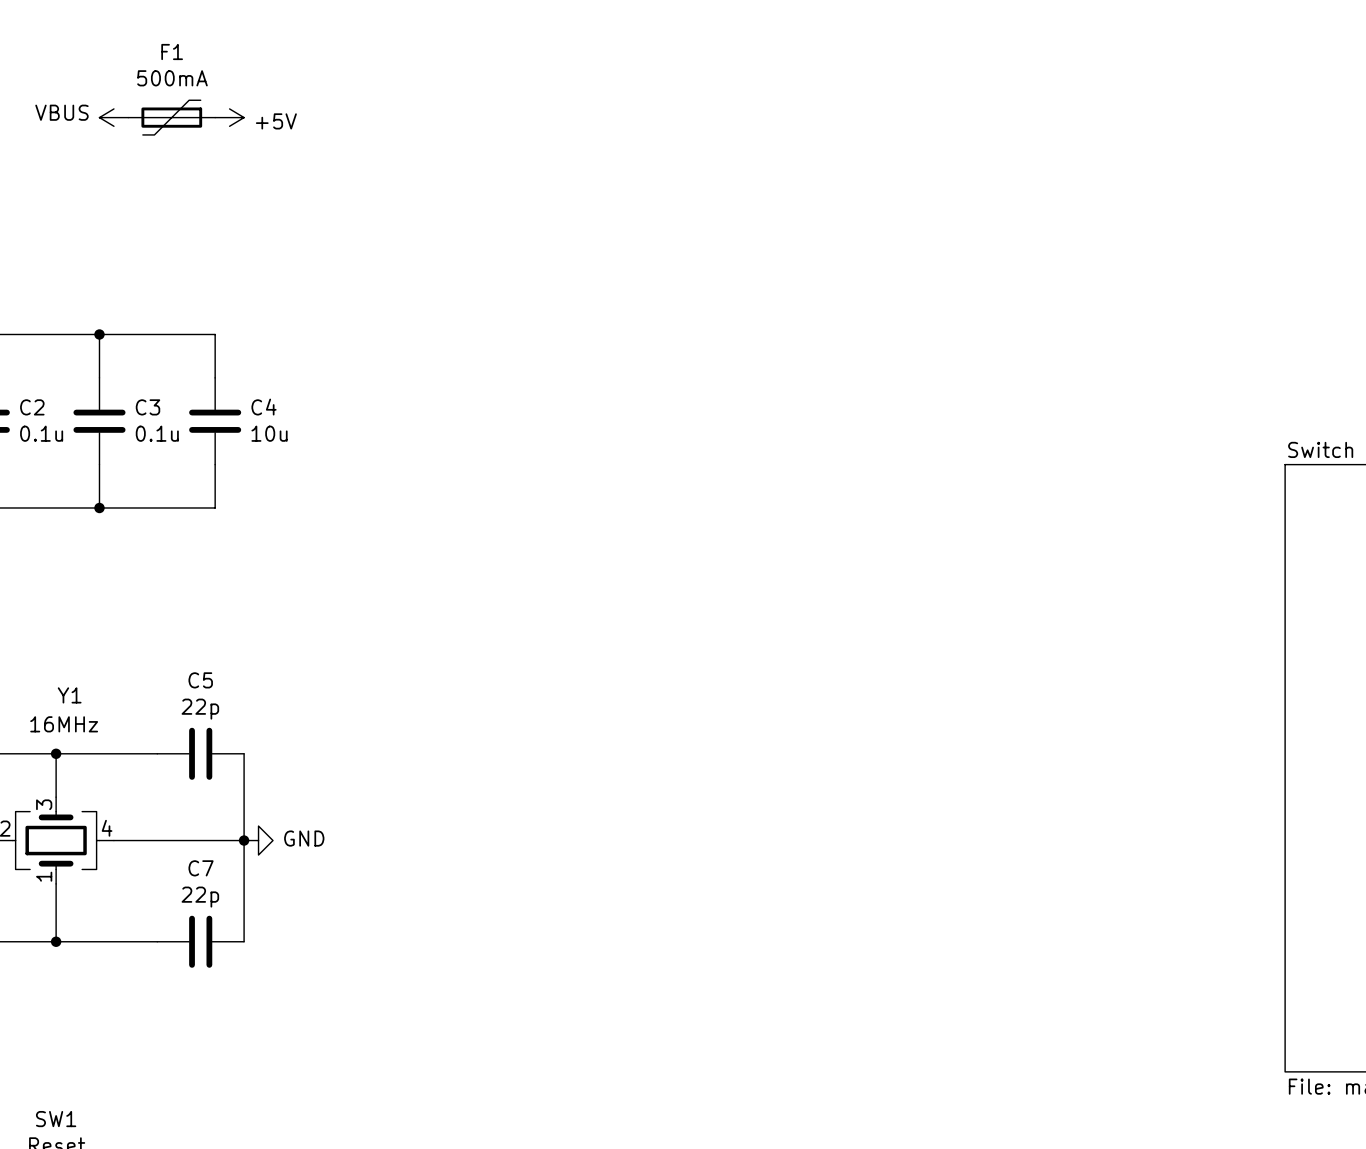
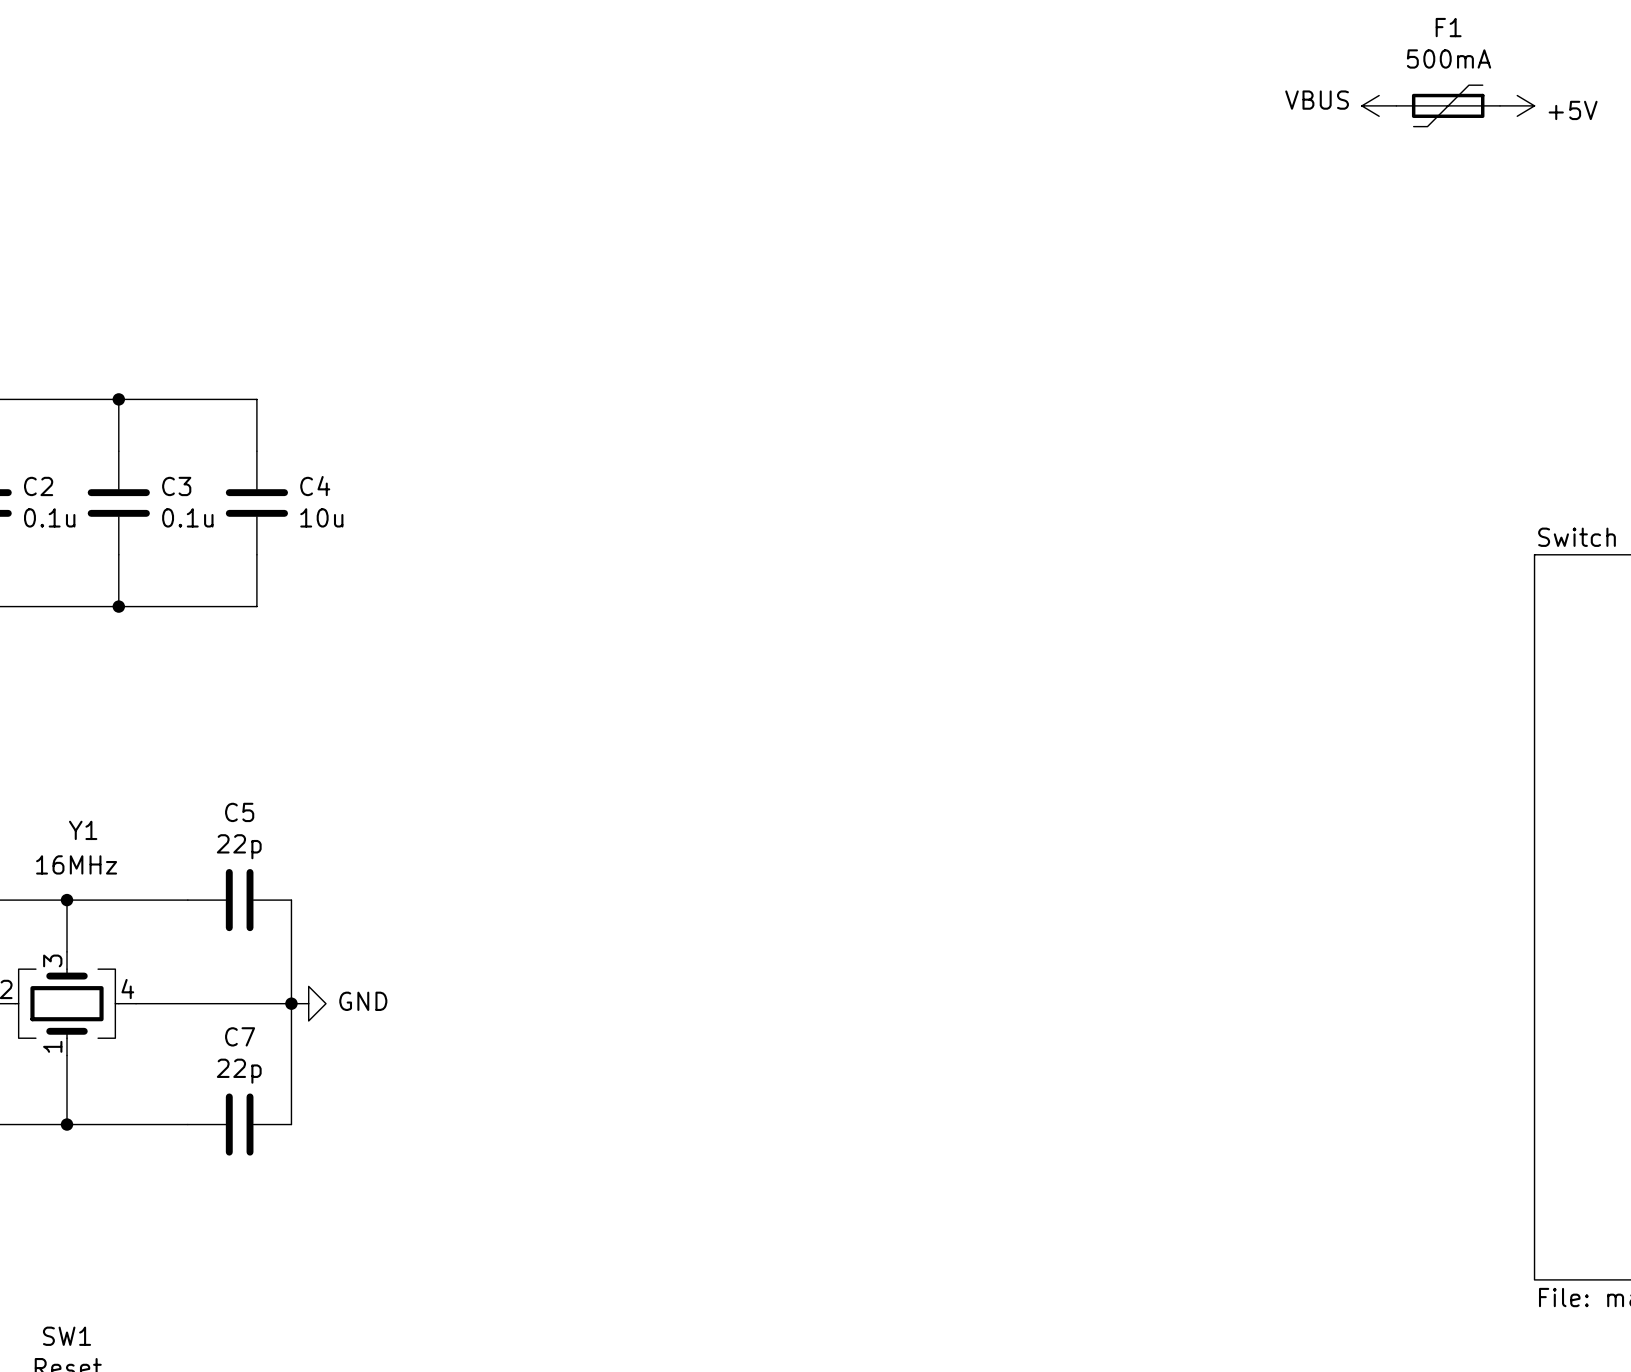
power symbol: none -> VBUS (1379, 105)
power symbol: none -> +5V (1517, 105)
power symbol: VBUS (113, 117) -> none
F1 position: (171, 117) -> (1448, 105)
power symbol: +5V (229, 117) -> none

